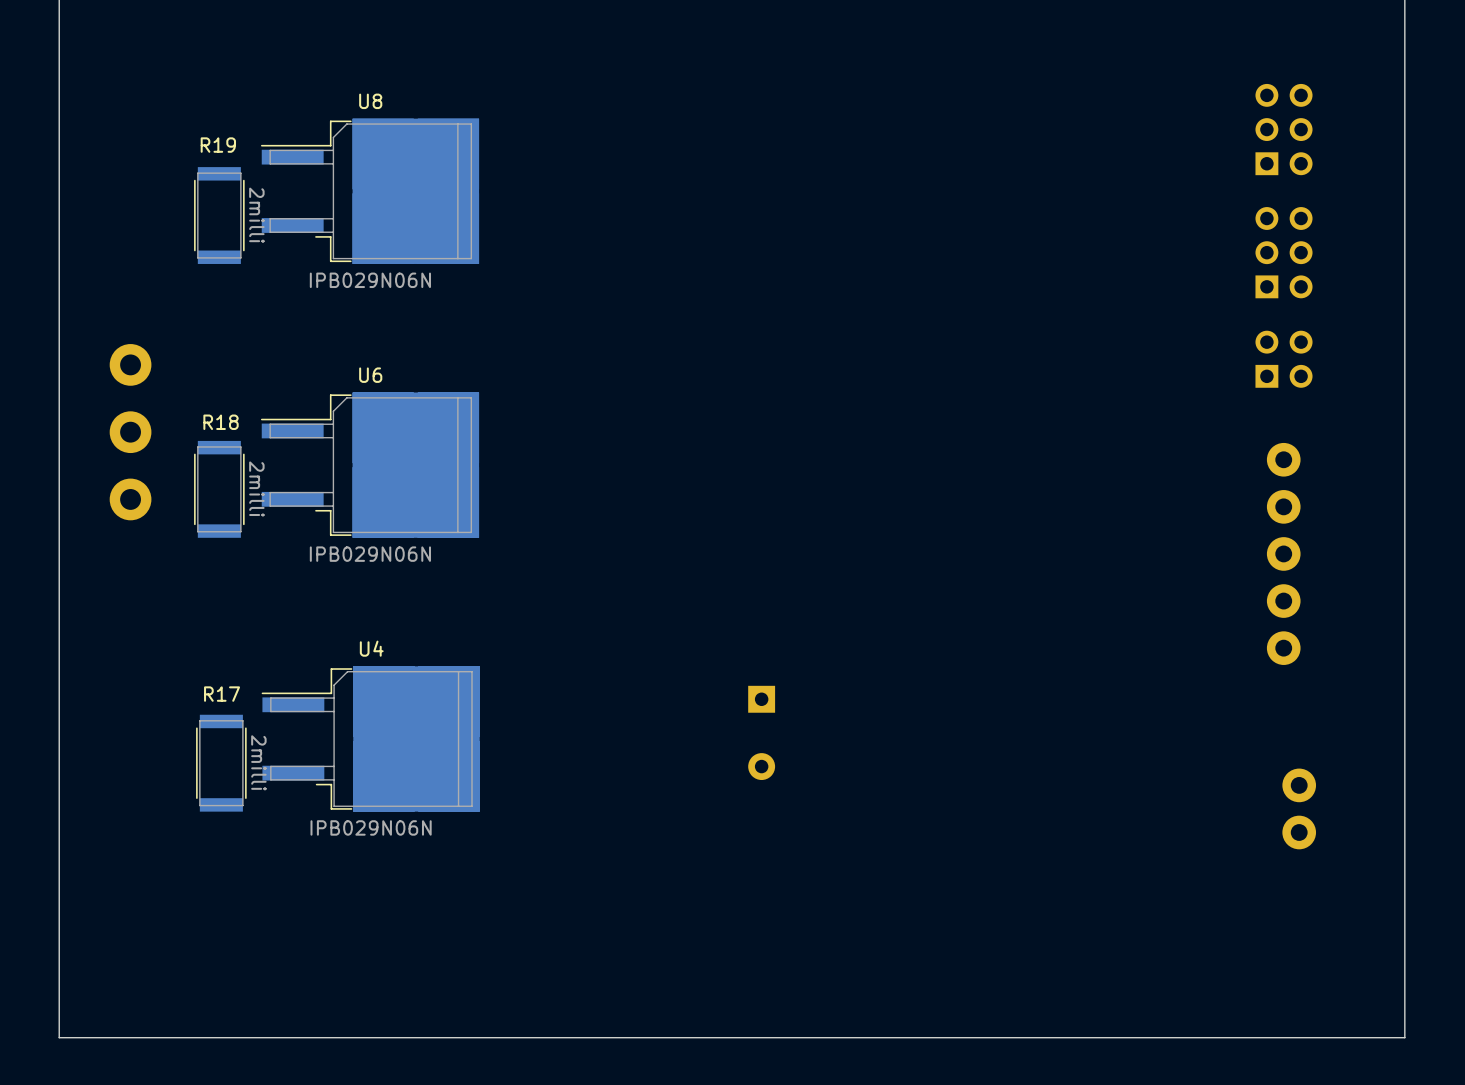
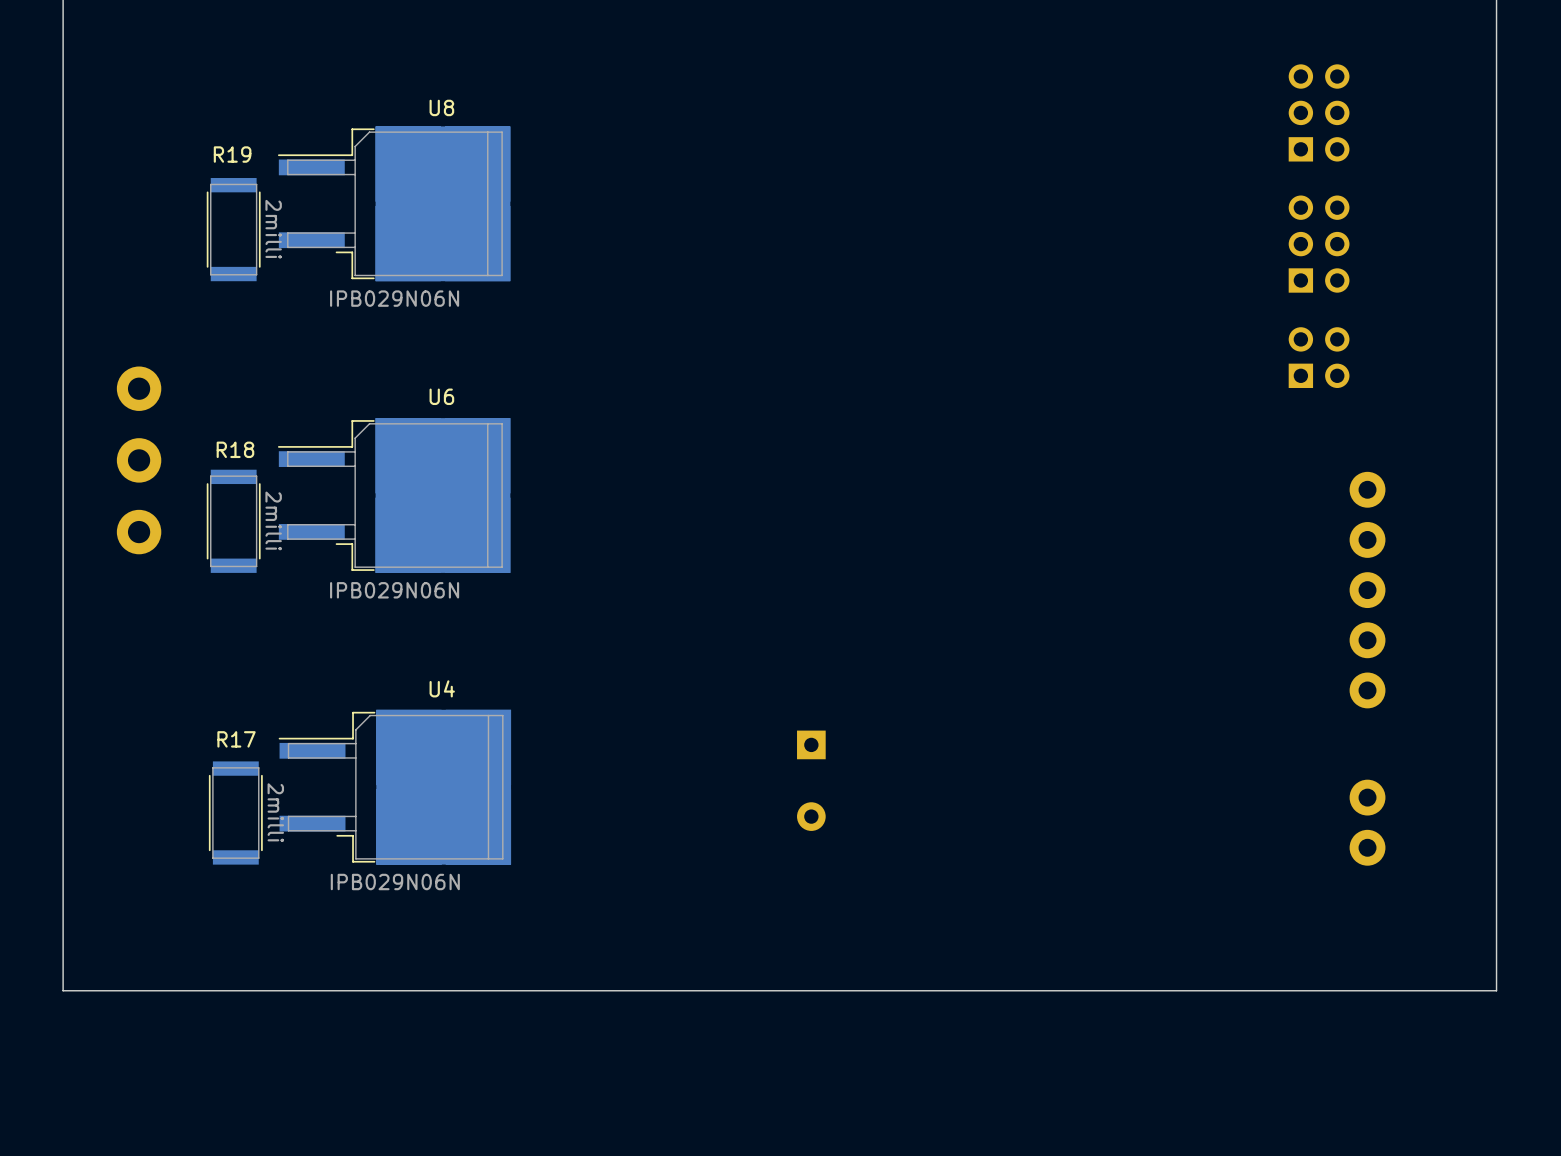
U8 name position: U8 (370, 101) -> U8 (441, 107)
part position: (1284, 129) -> (1319, 112)
part position: (1284, 252) -> (1319, 244)
part position: (1284, 359) -> (1319, 357)
U6 name position: U6 (370, 375) -> U6 (441, 396)
U4 name position: U4 (371, 648) -> U4 (442, 688)
part position: (1299, 808) -> (1367, 822)
board edge: (1404, 930) (1404, 1037) (59, 1037) (59, 930) -> (1496, 990) (63, 990)

